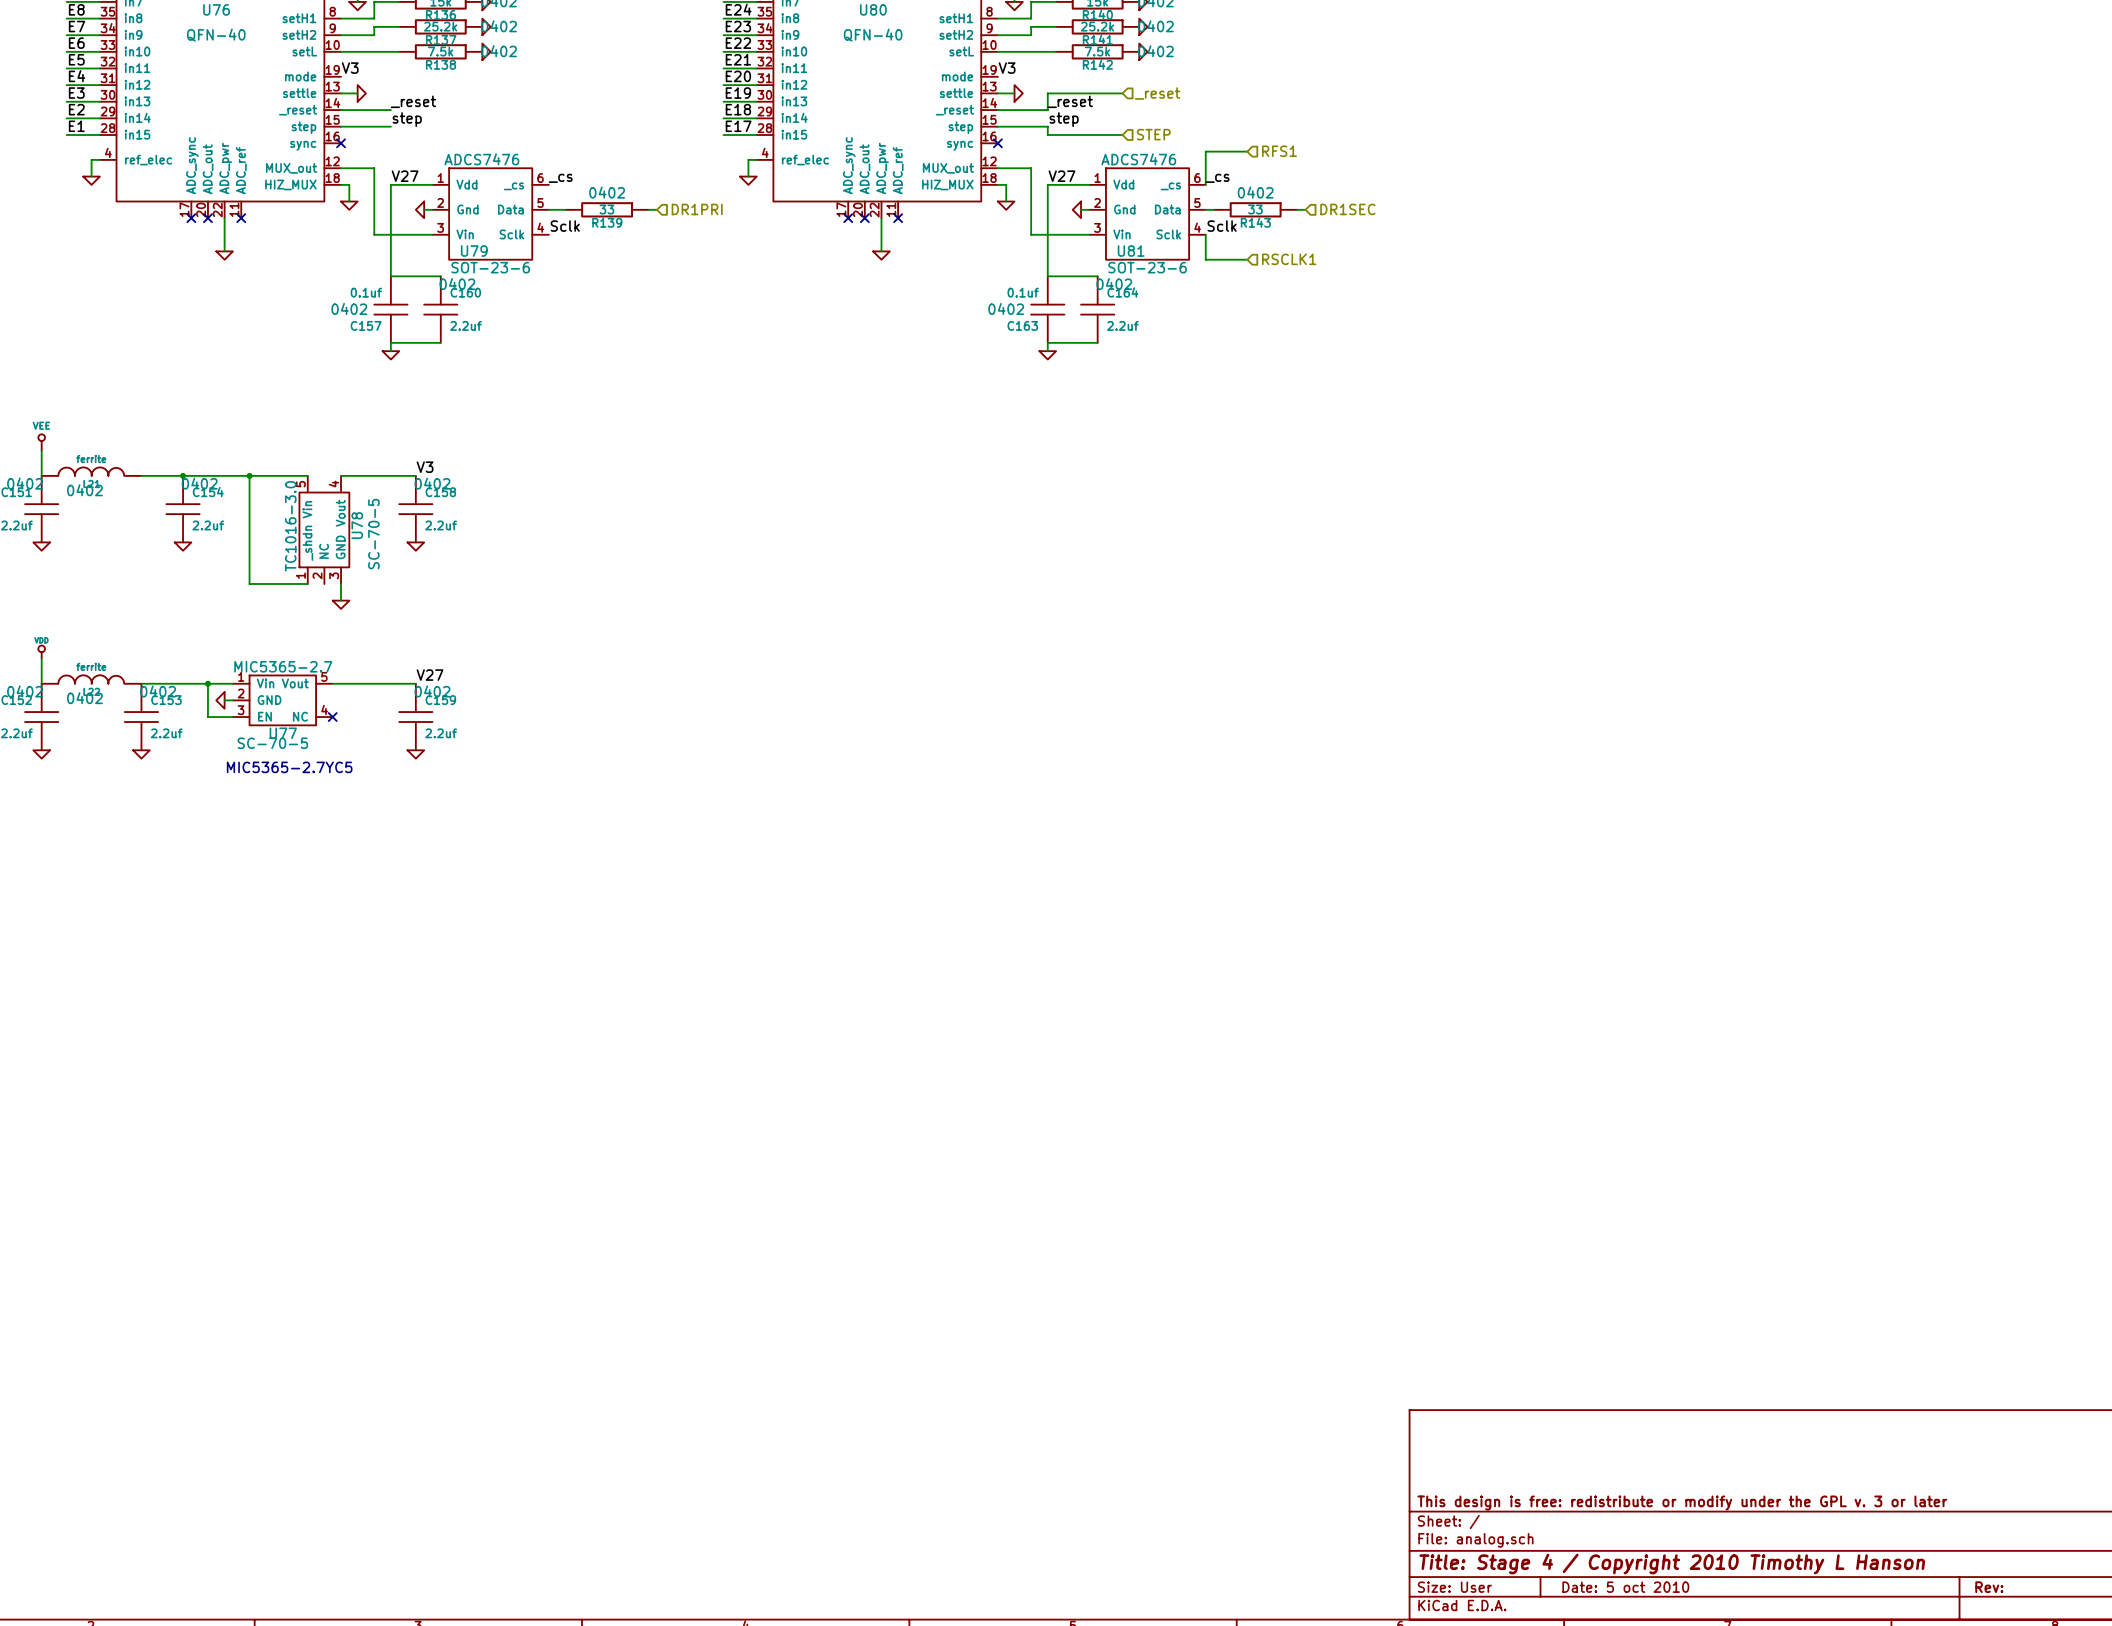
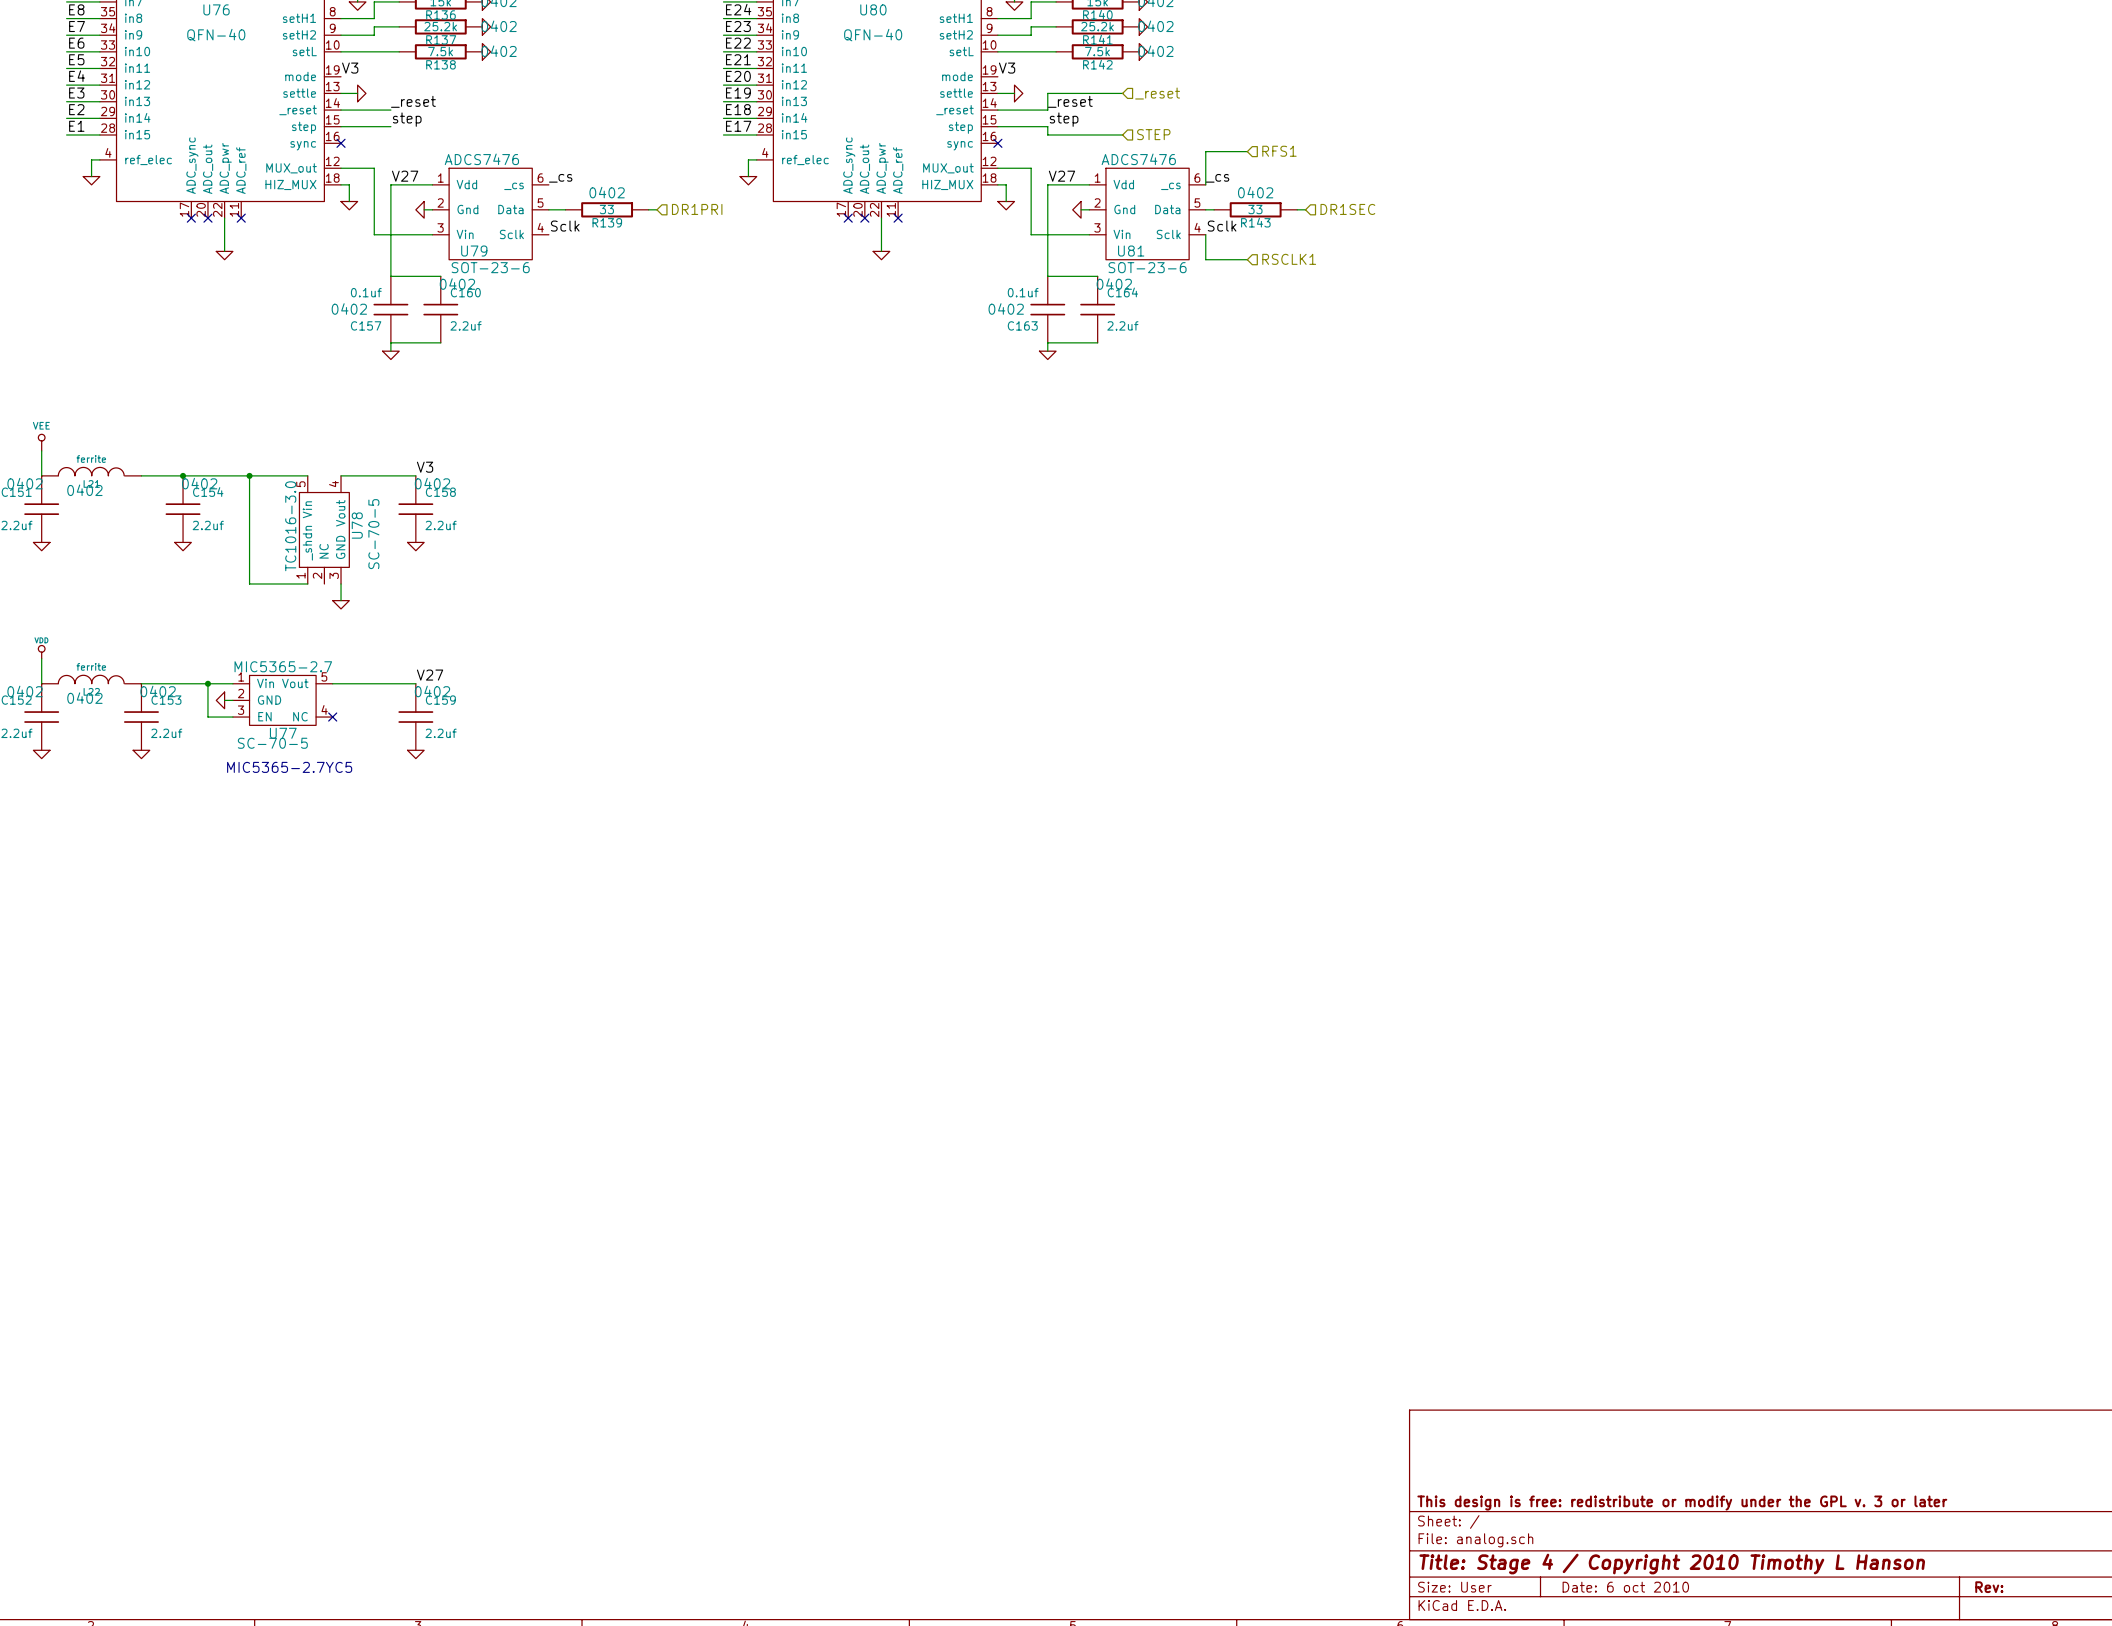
title block: Date: 5 oct 2010 (1625, 1587) -> Date: 6 oct 2010 (1625, 1587)

